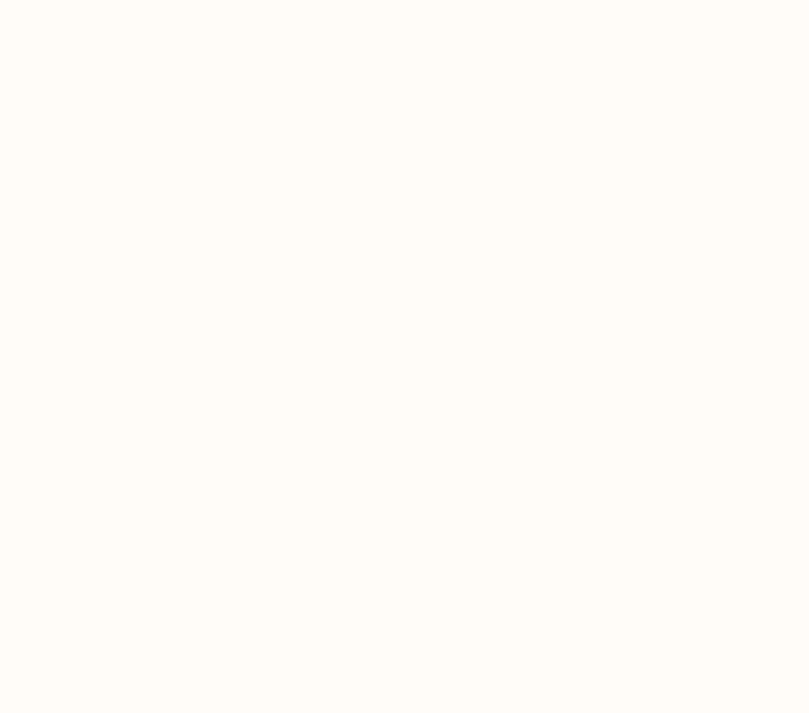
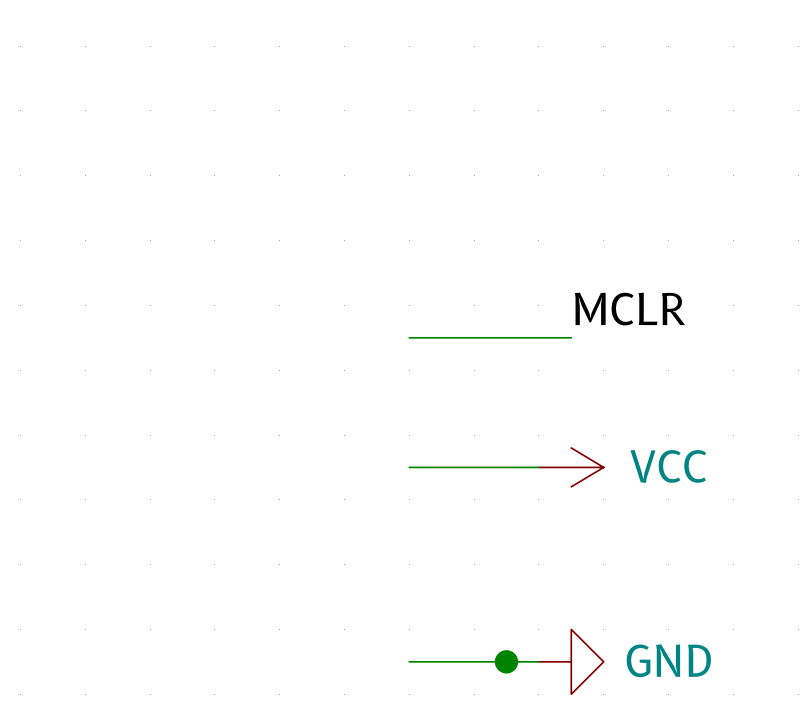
label: none -> MCLR (629, 309)
wire: none -> (409, 337) (571, 337)
wire: none -> (409, 467) (538, 467)
power symbol: none -> VCC (571, 467)
wire: none -> (409, 661) (538, 661)
junction: none -> (506, 661)
power symbol: none -> GND (571, 661)

